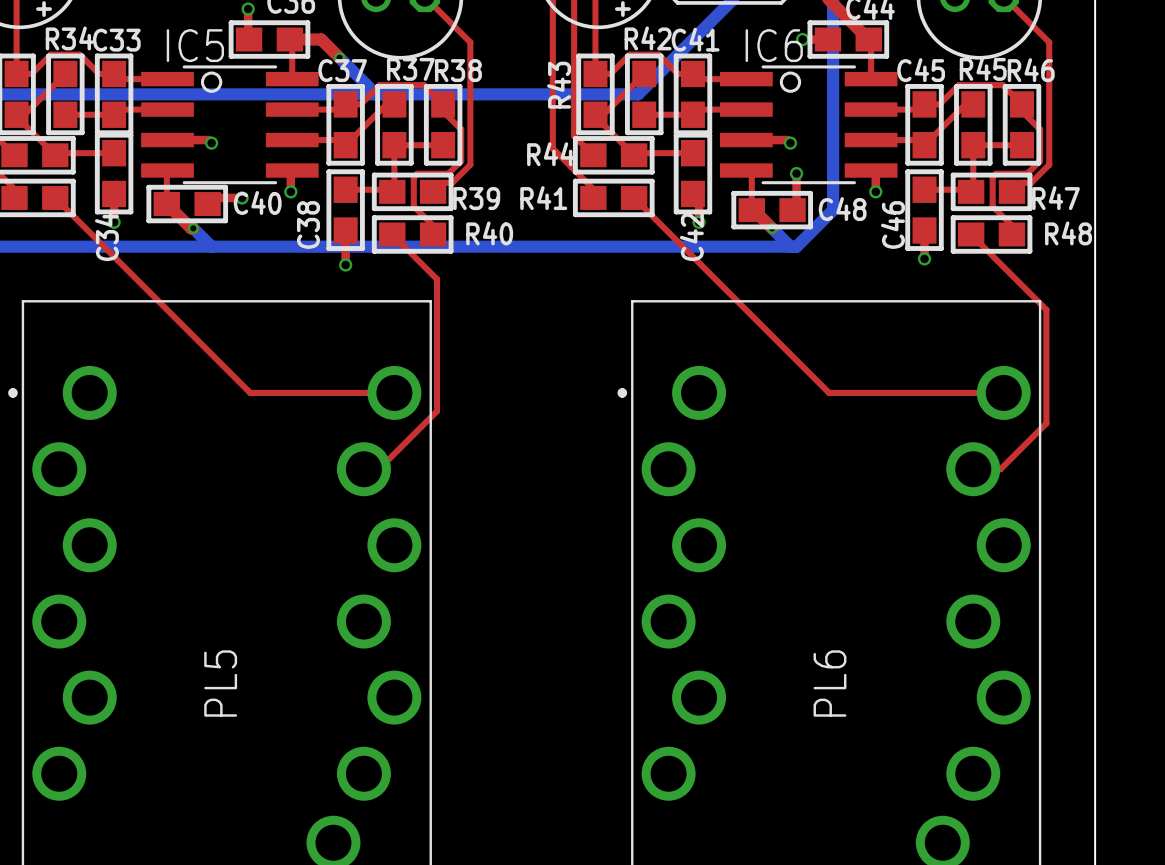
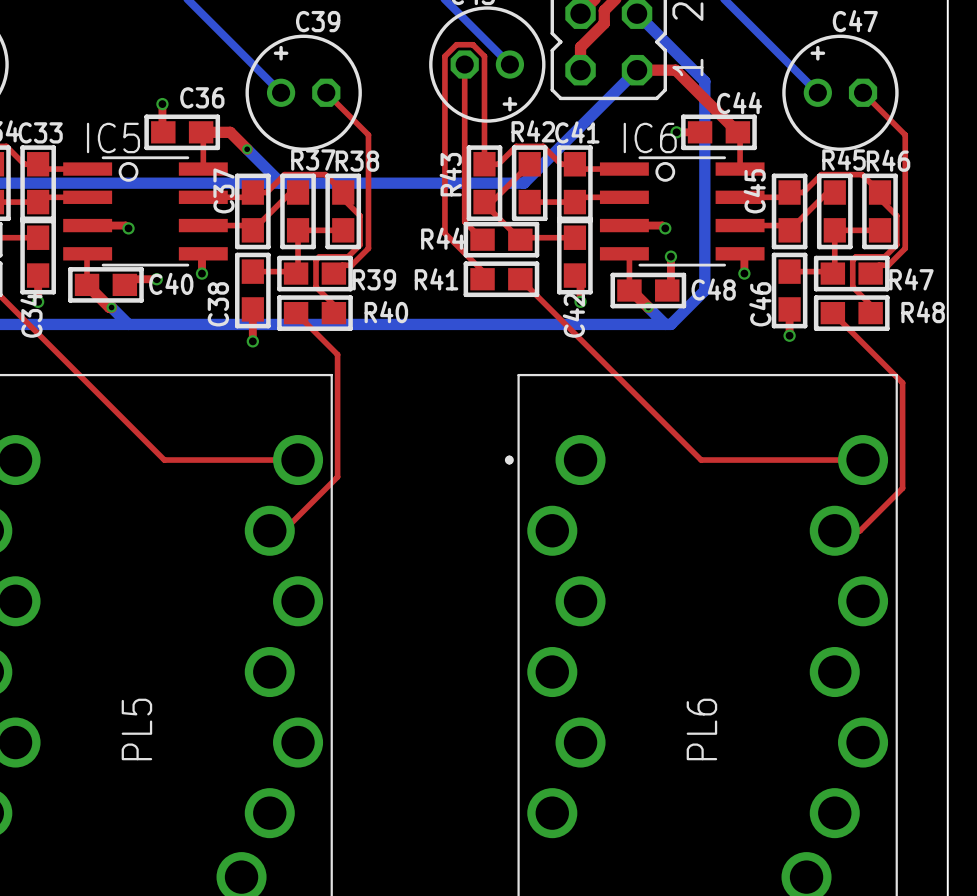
C37 name rotation: 0° (342, 70) -> 90° counterclockwise (224, 190)
C45 name rotation: 0° (921, 70) -> 90° counterclockwise (754, 191)

